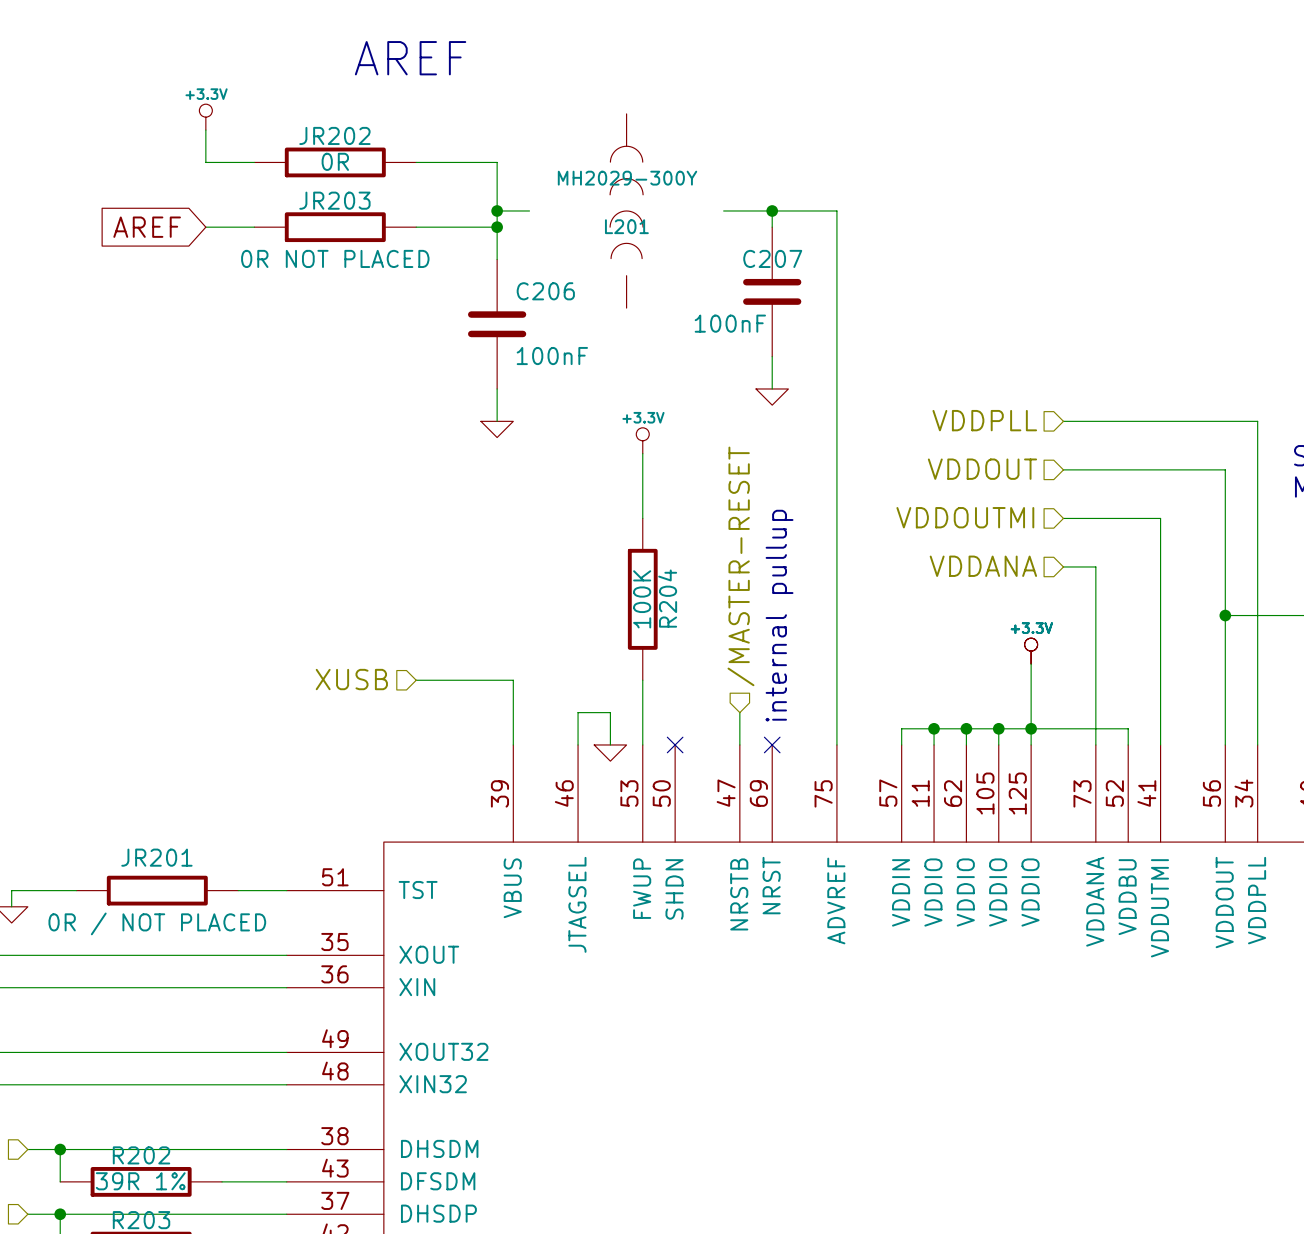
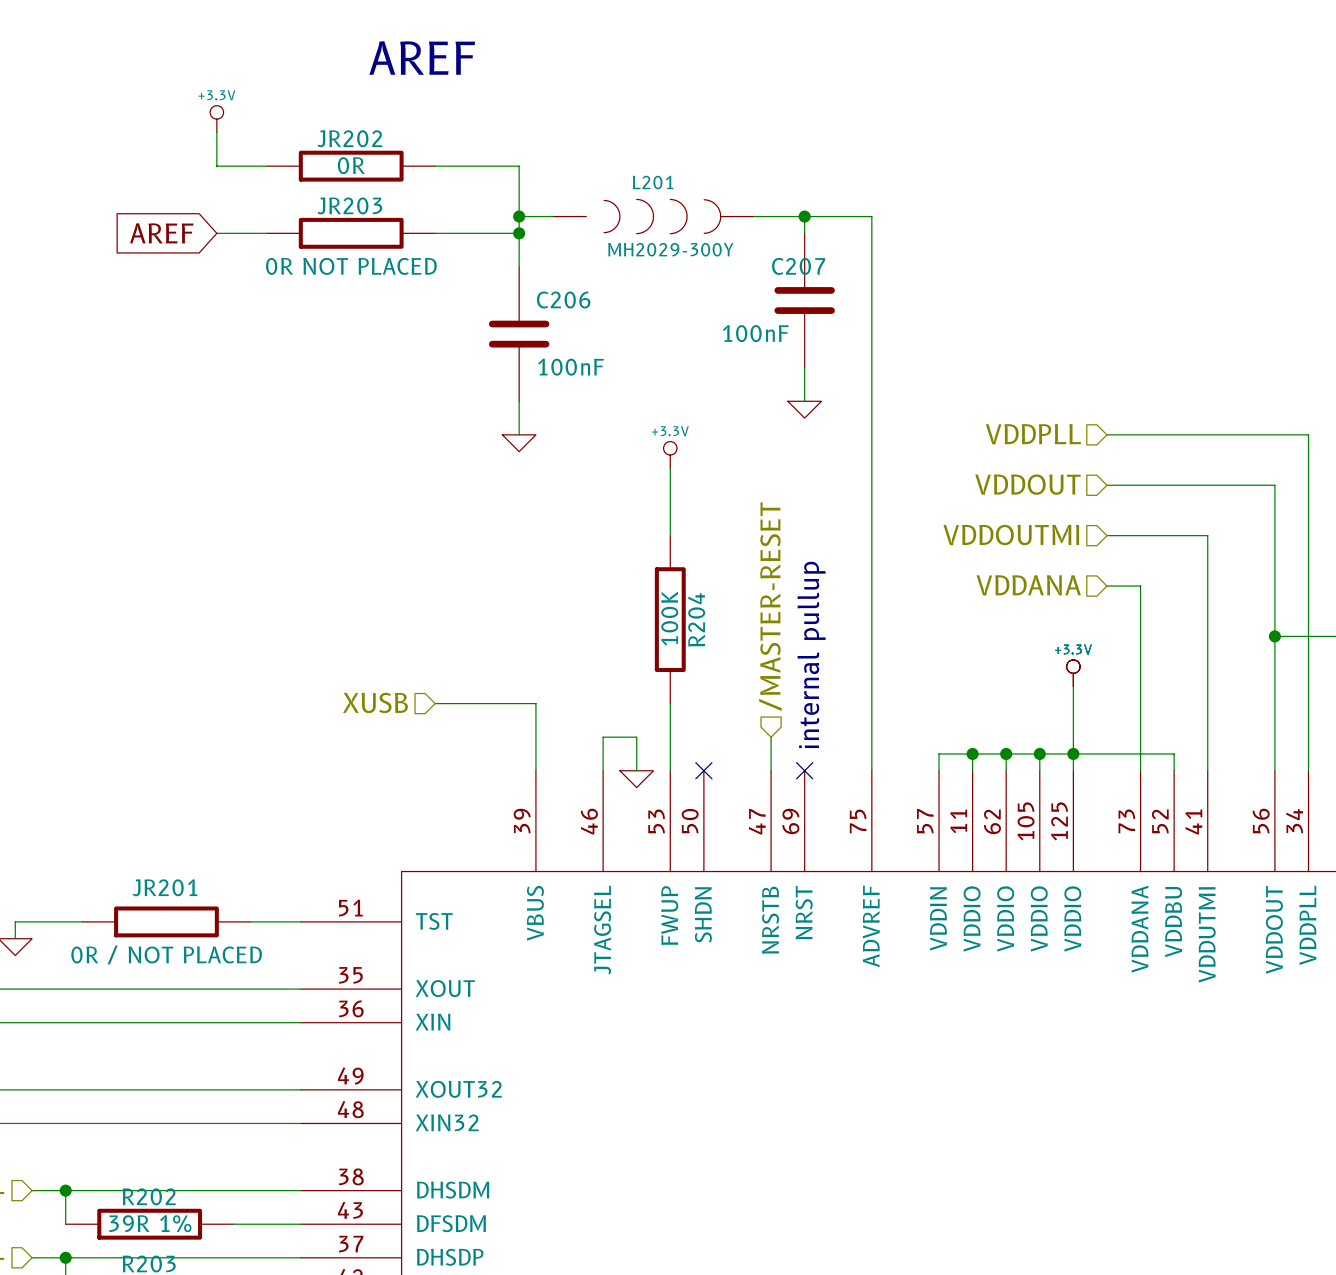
L201 value position: MH2029-300Y (627, 178) -> MH2029-300Y (670, 249)
L201 rotation: 0° (626, 202) -> 90° clockwise (662, 216)
L201 name position: L201 (626, 226) -> L201 (653, 182)

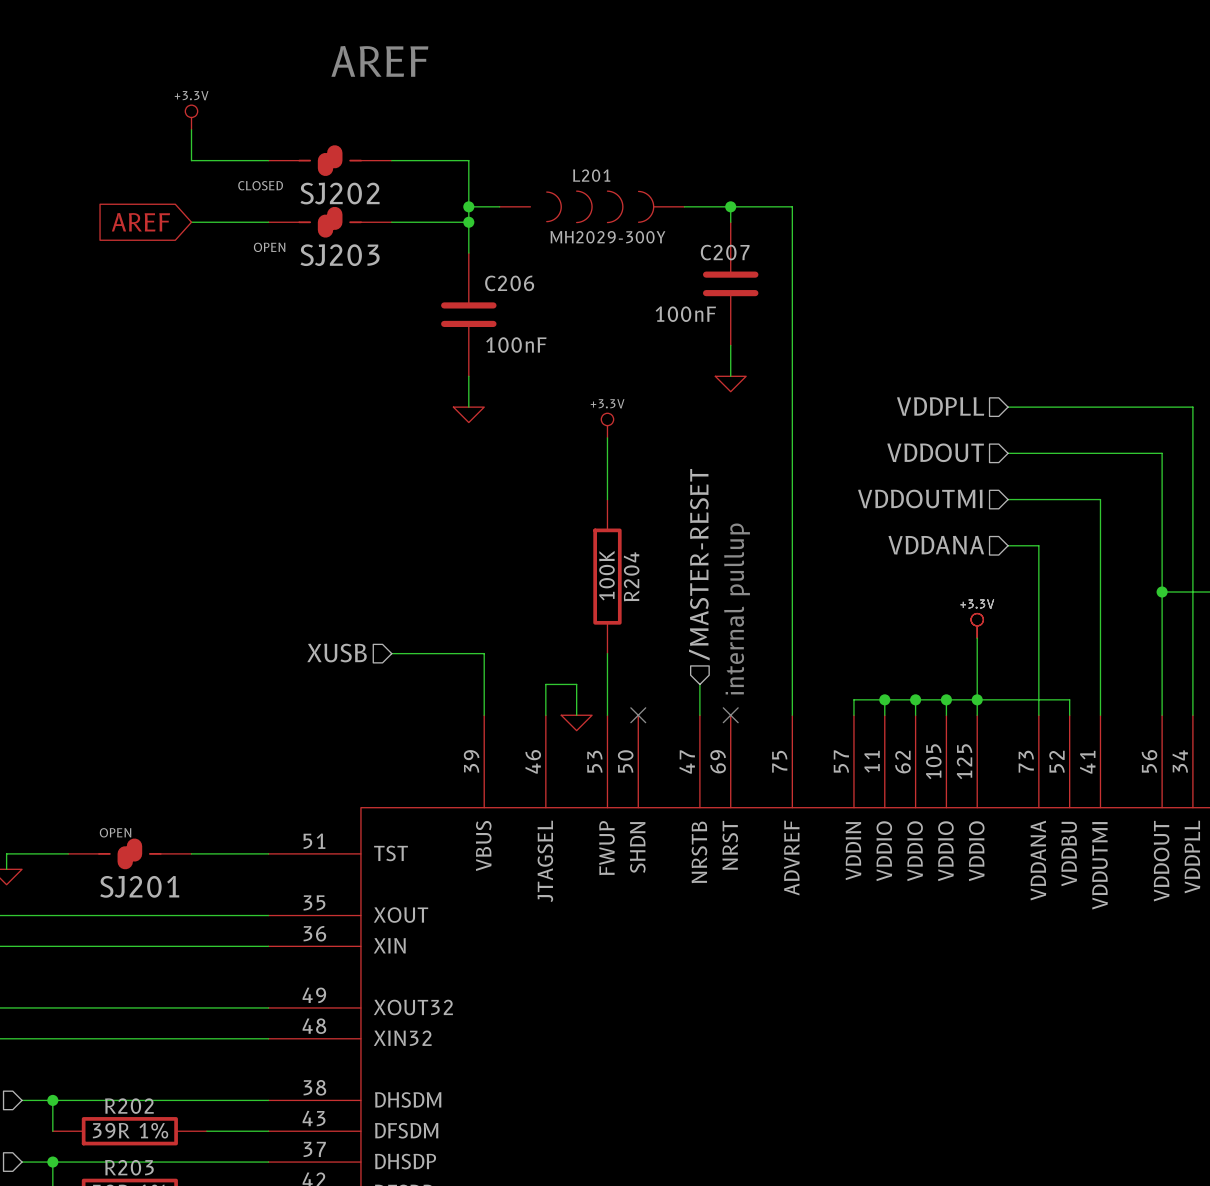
JR202: 0R (351, 166) -> none
SJ202: none -> CLOSED (330, 160)
JR203: 0R NOT PLACED (351, 233) -> none
SJ203: none -> OPEN (330, 222)
SJ201: none -> OPEN (129, 853)
JR201: 0R / NOT PLACED (166, 921) -> none

